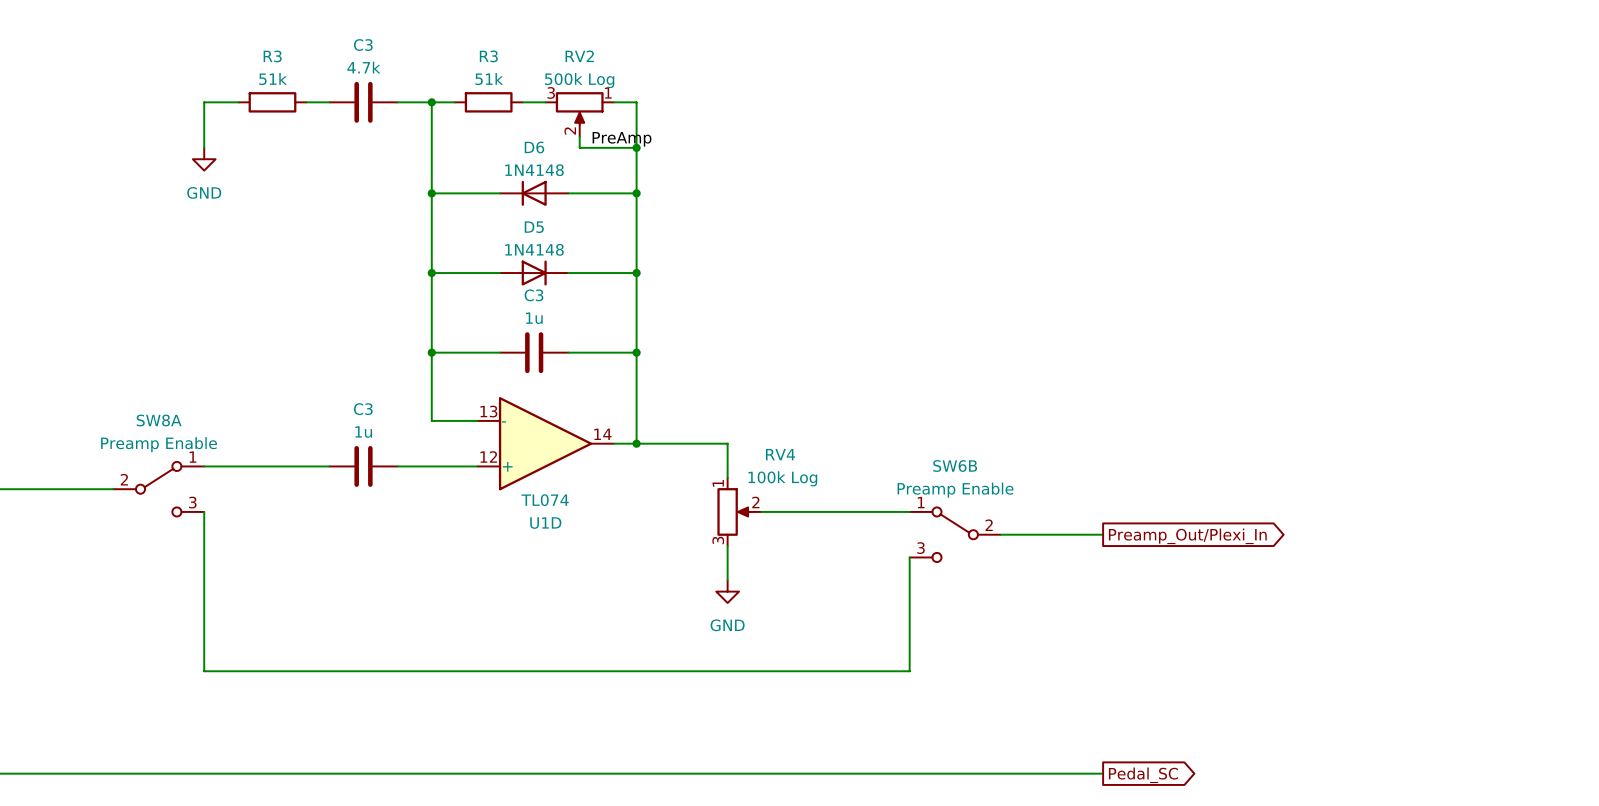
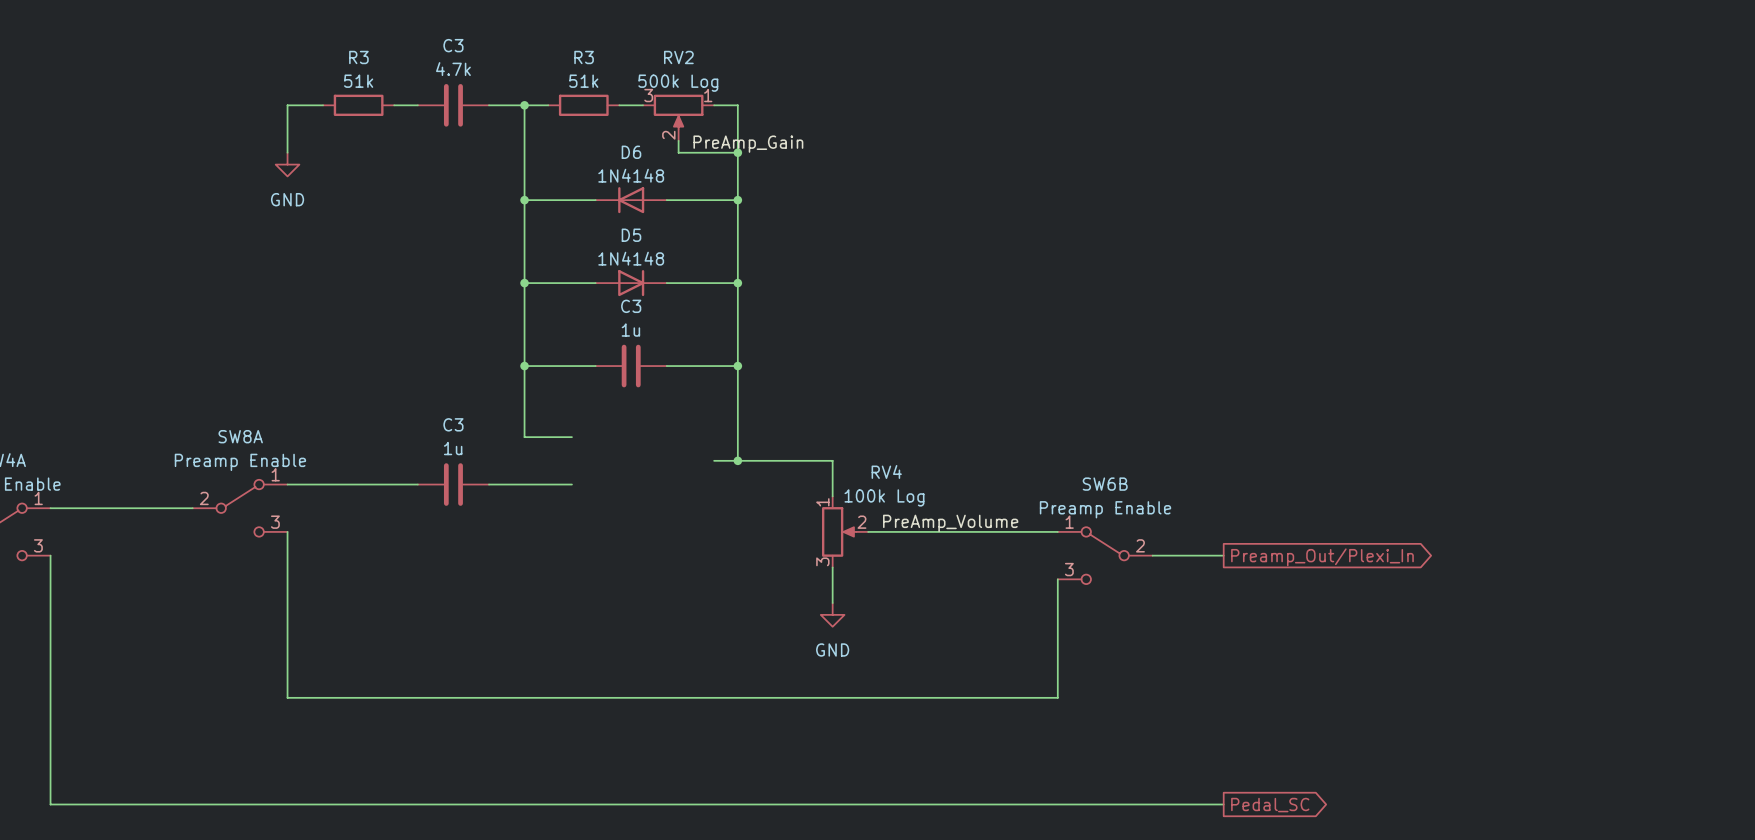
label: PreAmp (622, 139) -> PreAmp_Gain (748, 144)
U1D: TL074 (545, 443) -> none
label: none -> PreAmp_Volume (950, 523)
SW6B position: (955, 534) -> (1105, 555)
wire: (909, 557) (909, 671) -> (1057, 579) (1057, 697) (1022, 697)

